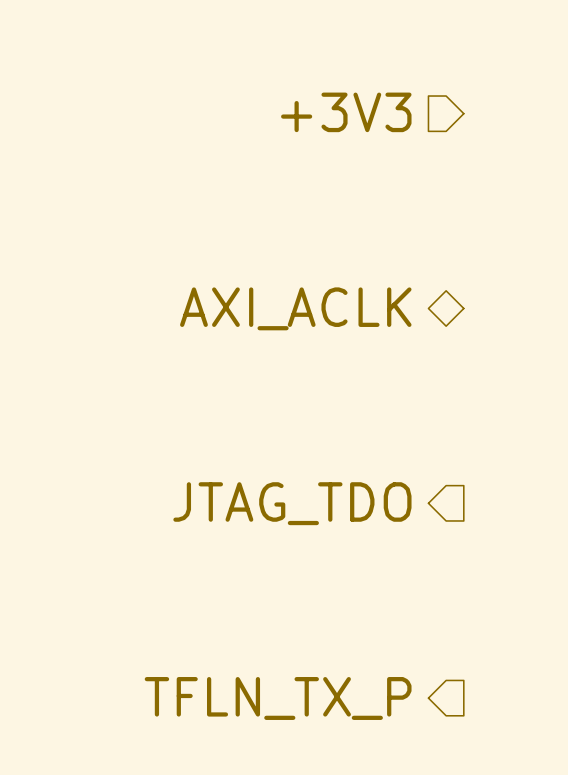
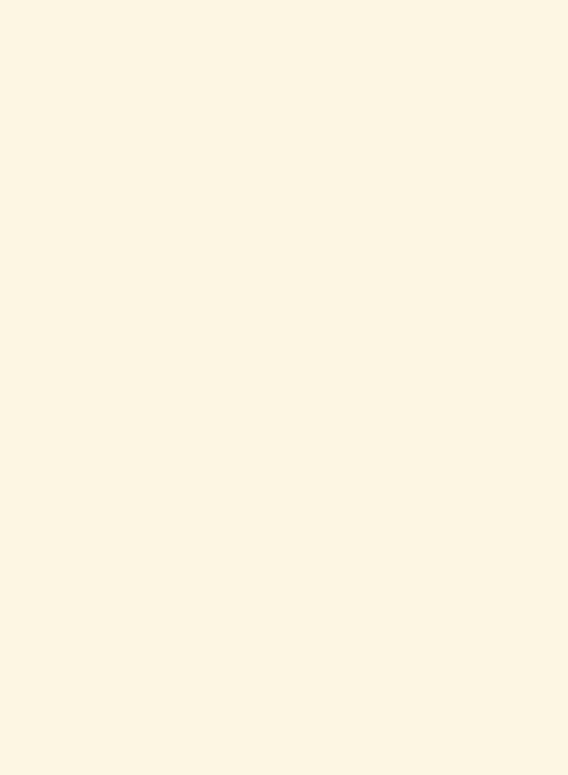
hierarchical label: +3V3 (346, 112) -> none
hierarchical label: AXI_ACLK (295, 308) -> none
hierarchical label: JTAG_TDO (292, 503) -> none
hierarchical label: TFLN_TX_P (278, 698) -> none

